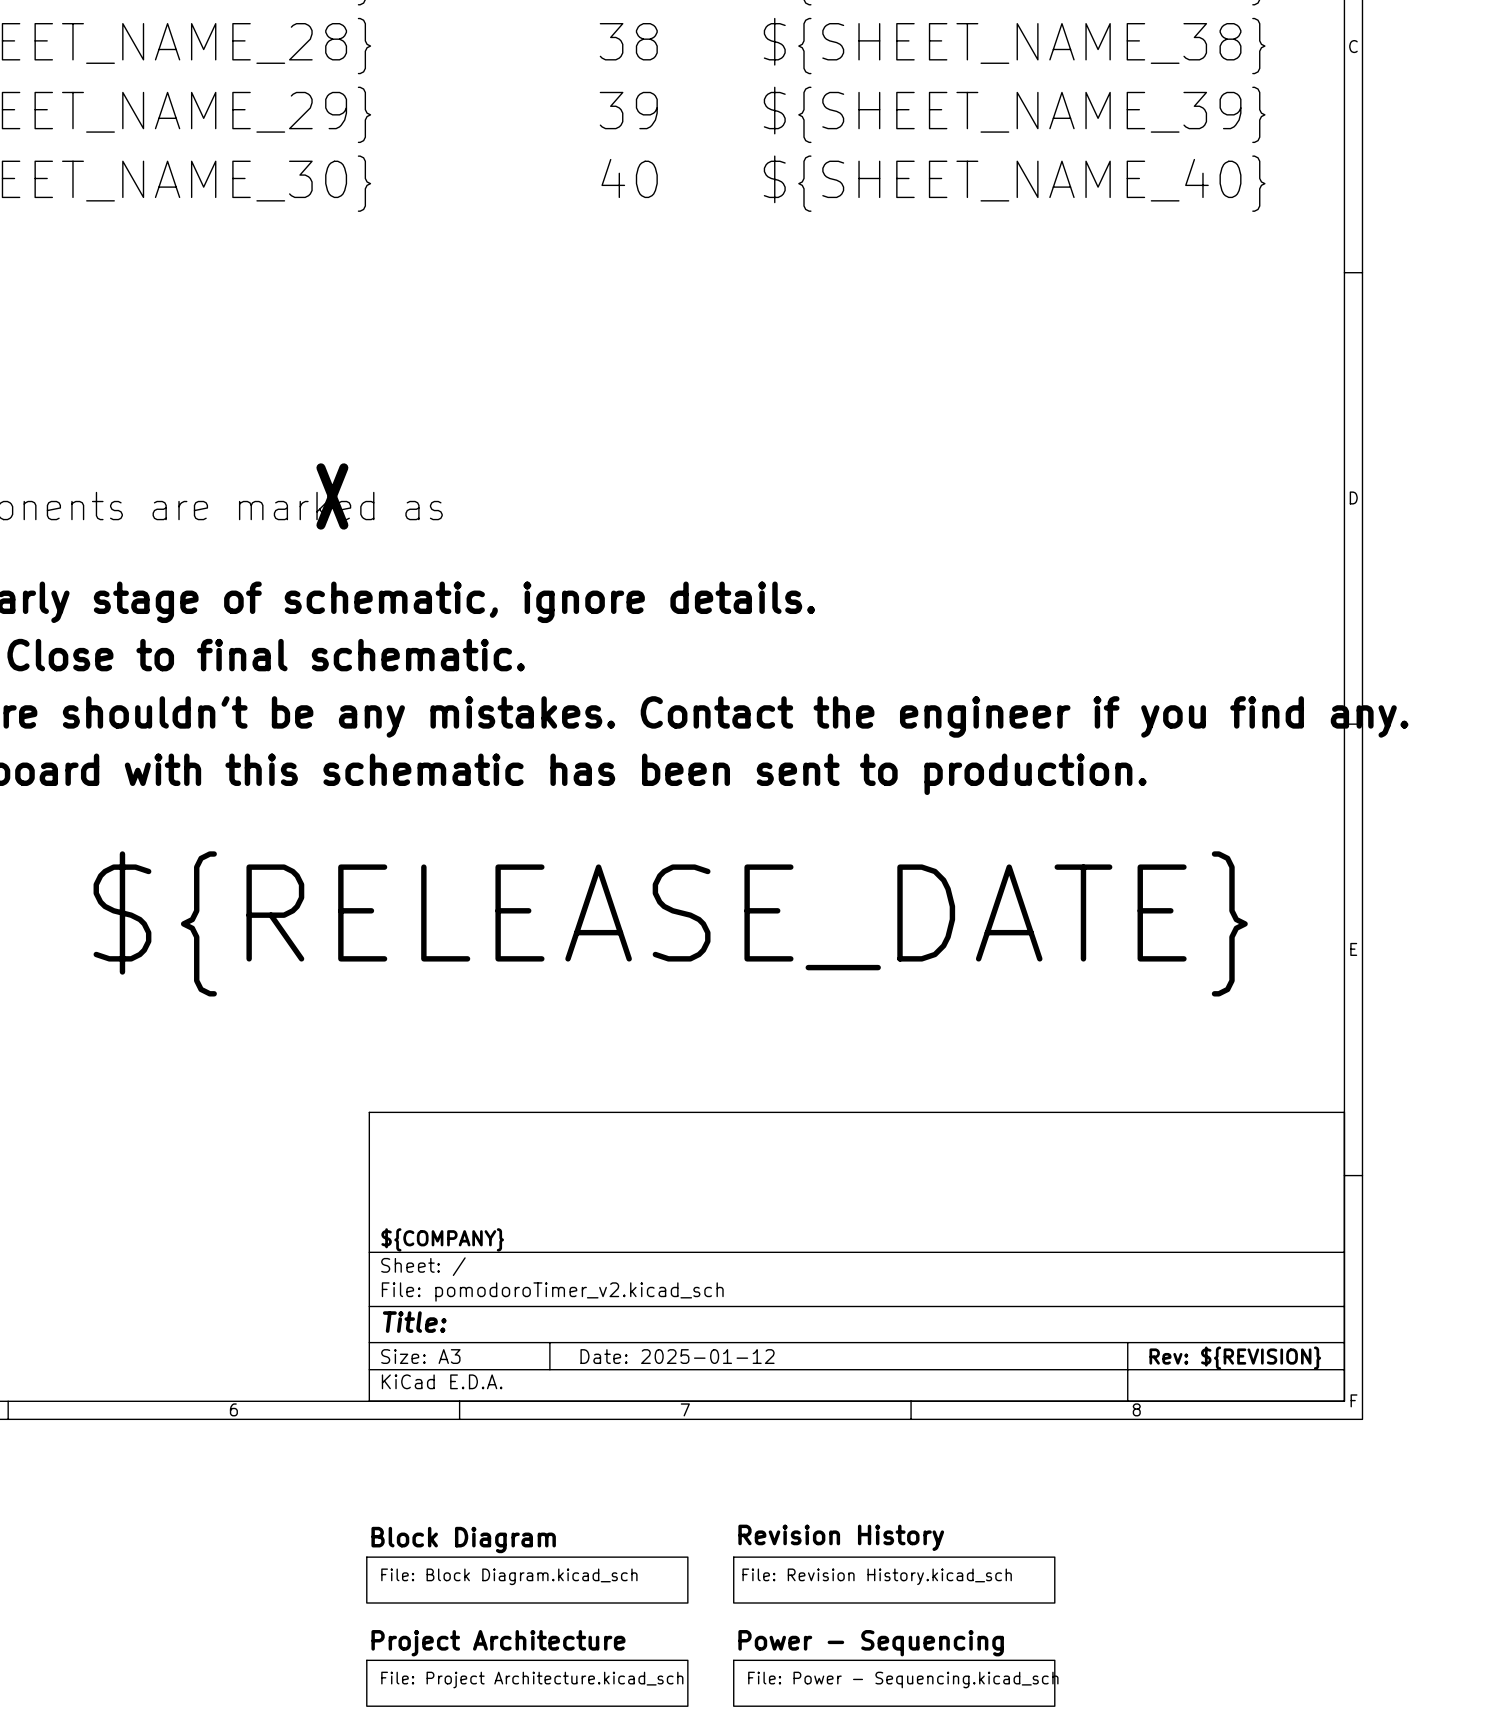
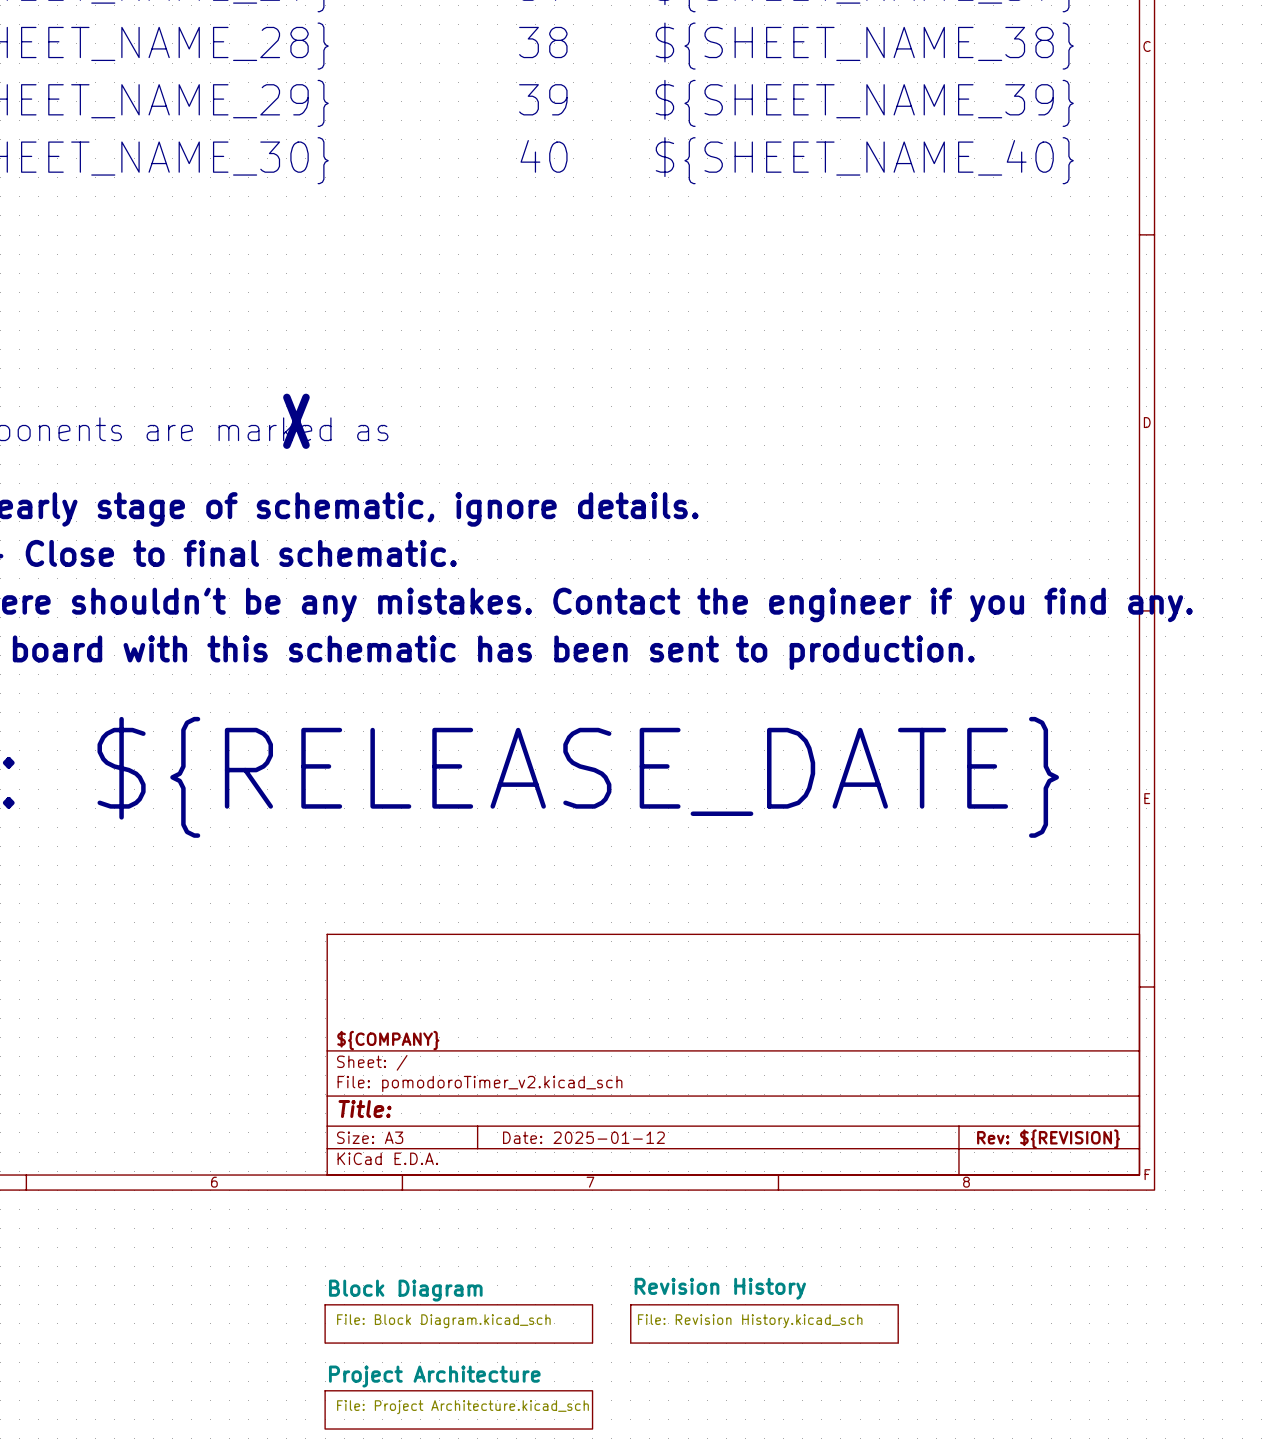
sheet Power - Sequencing: File: Power - Sequencing.kicad_sch (894, 1683) -> none

